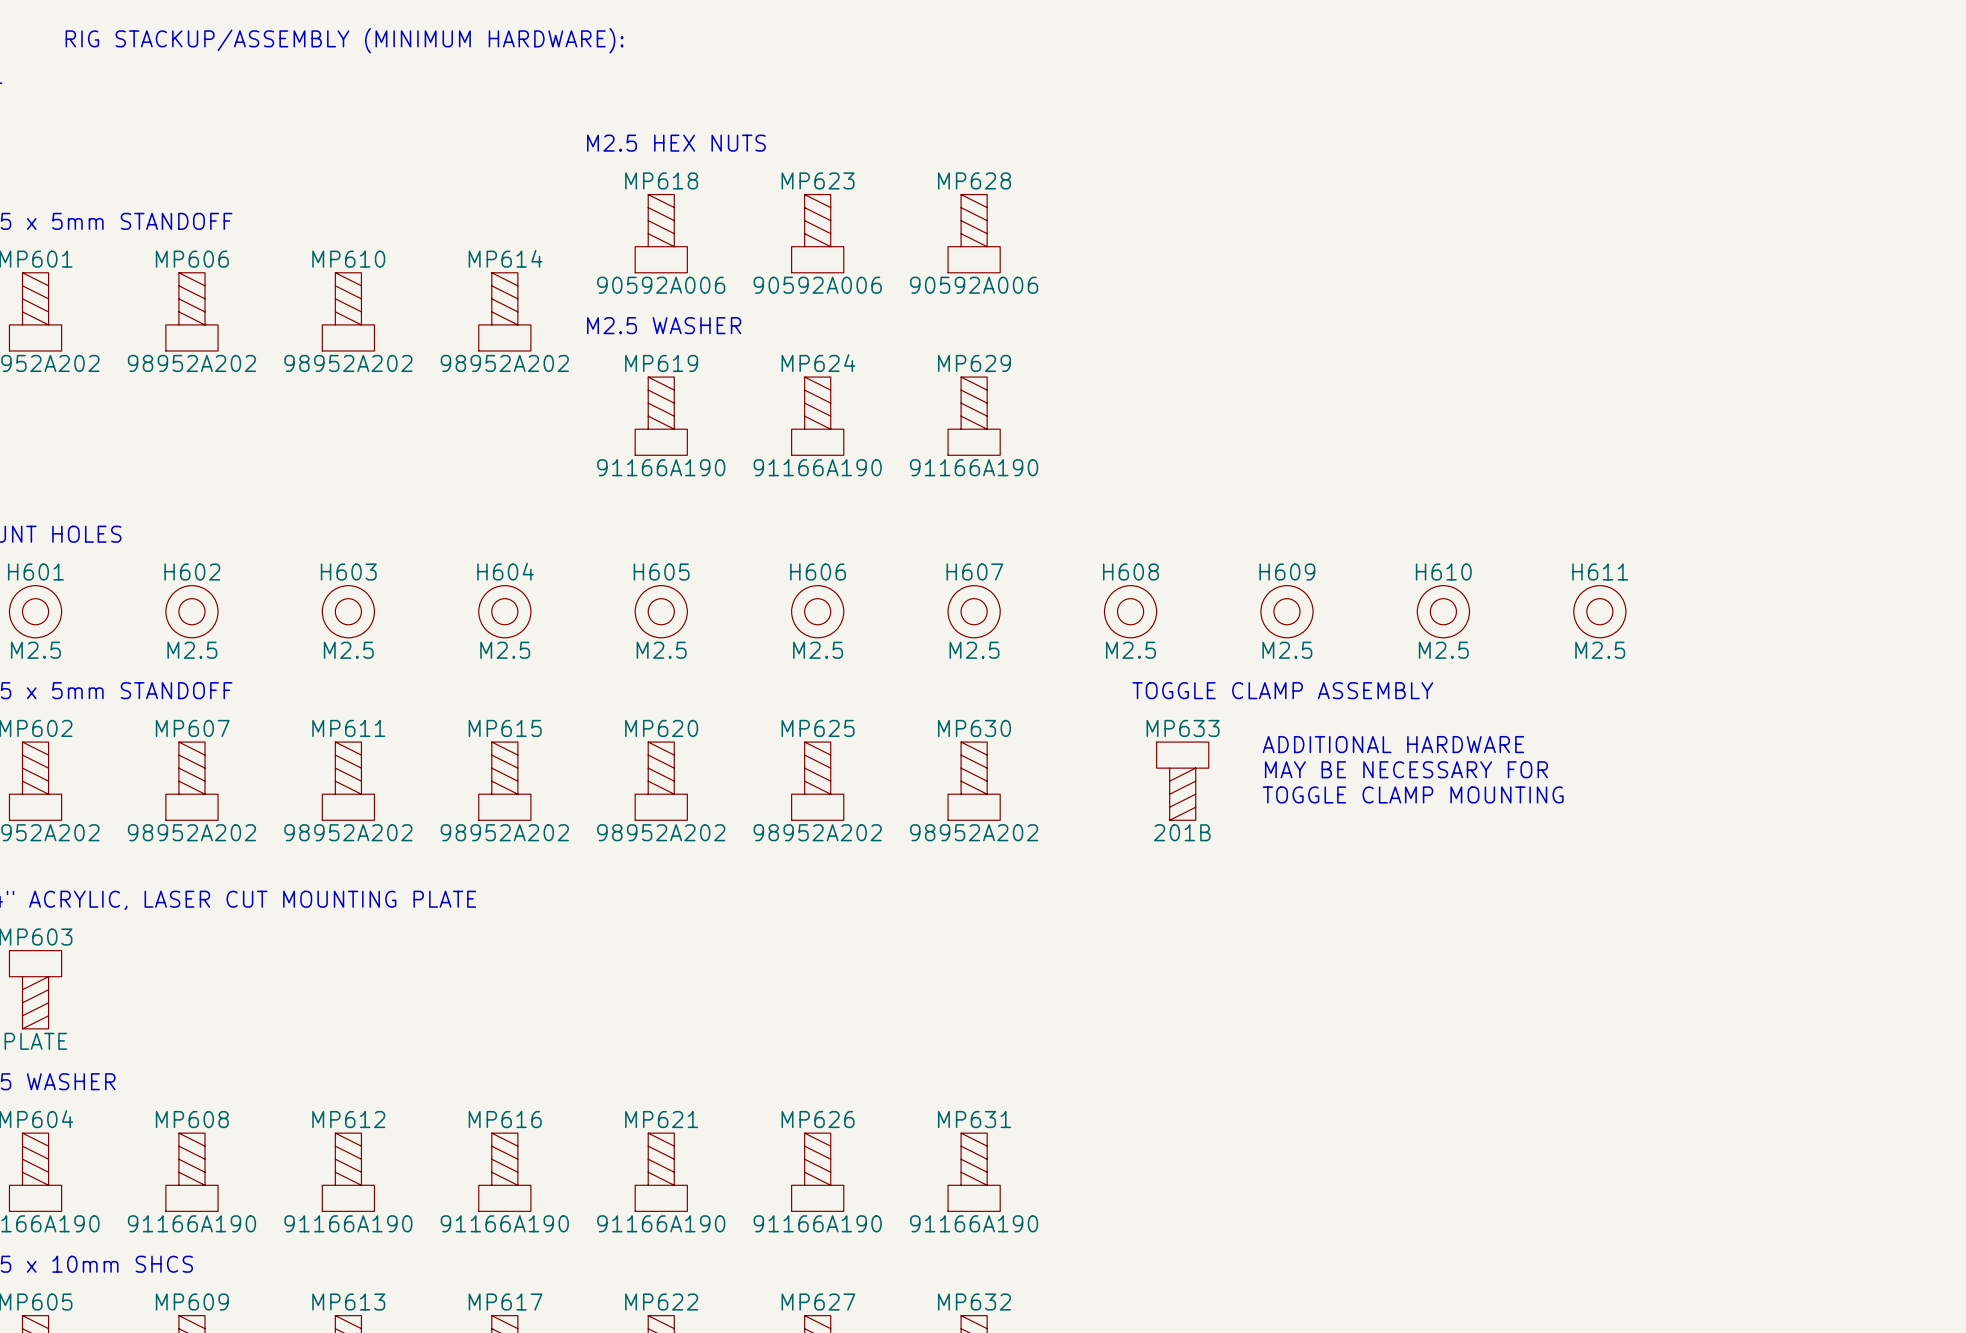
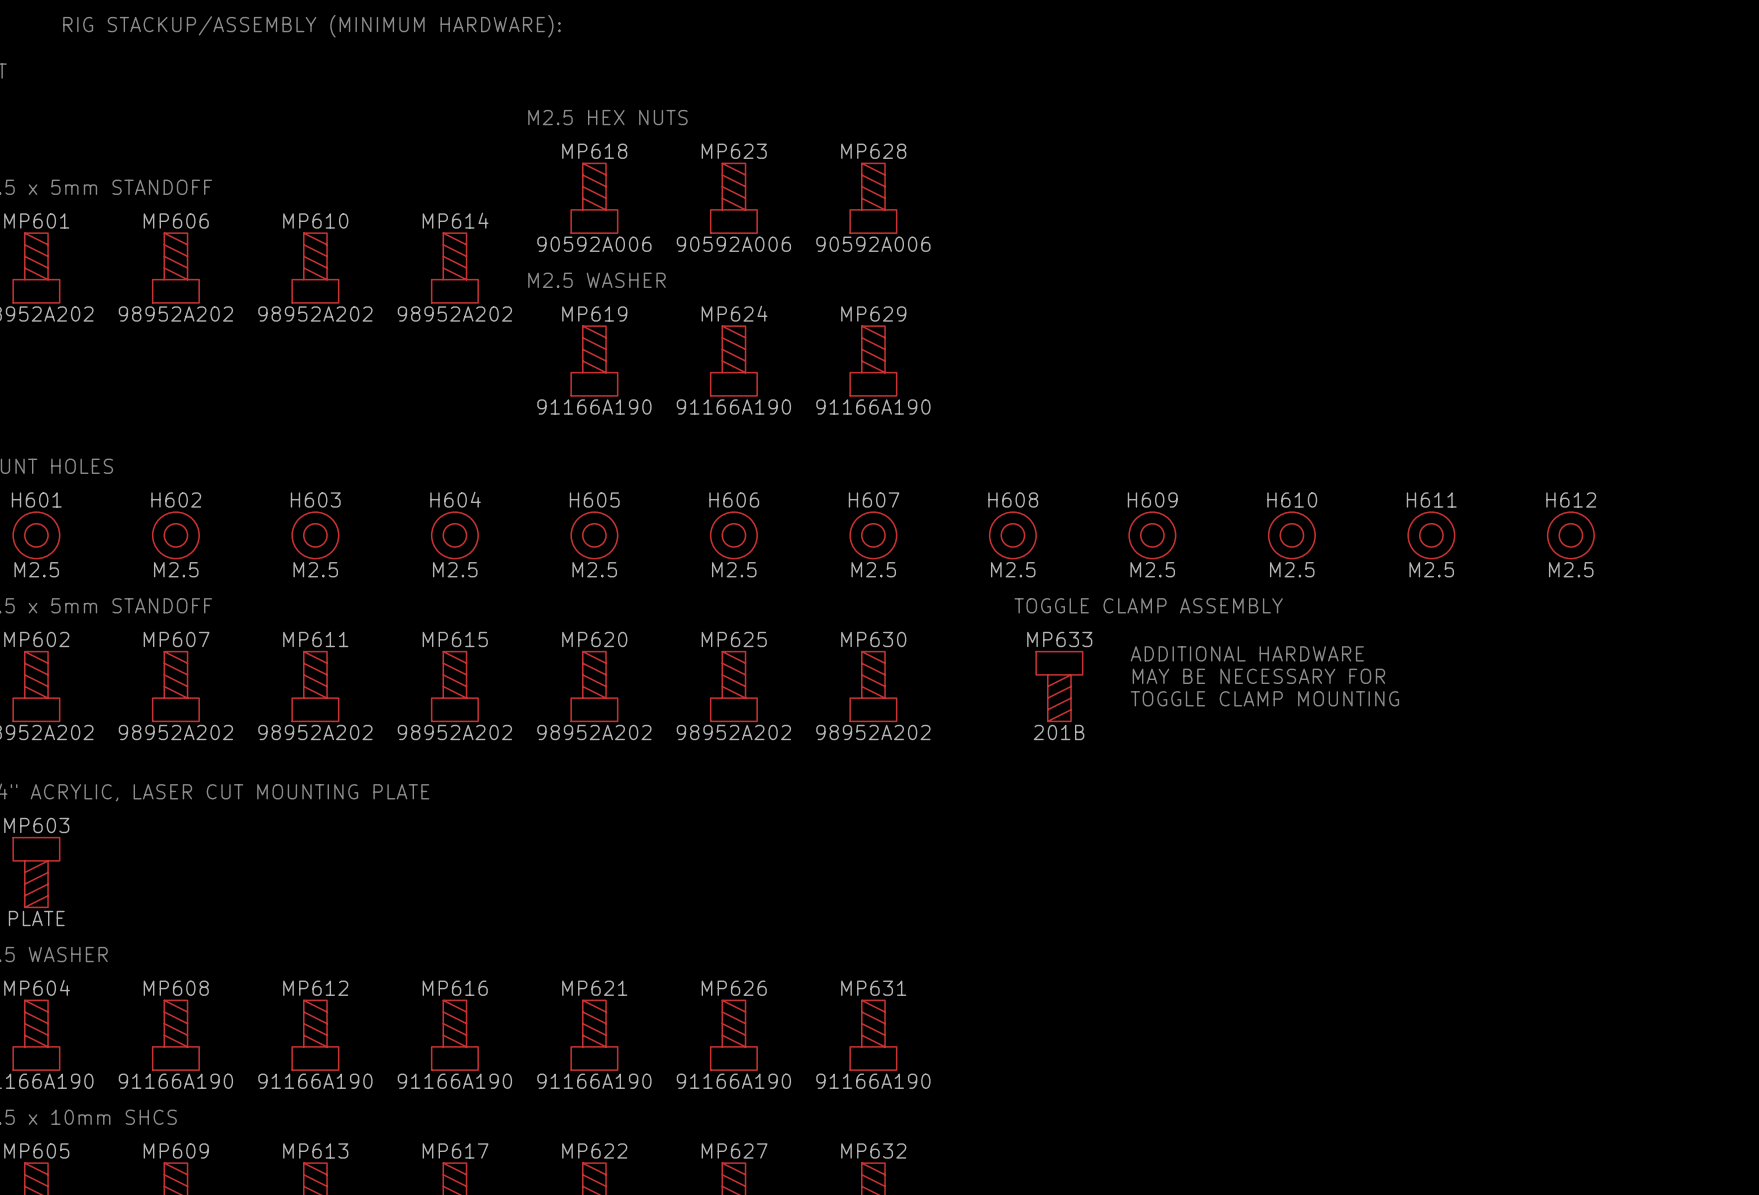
H612: none -> M2.5 (1570, 535)

